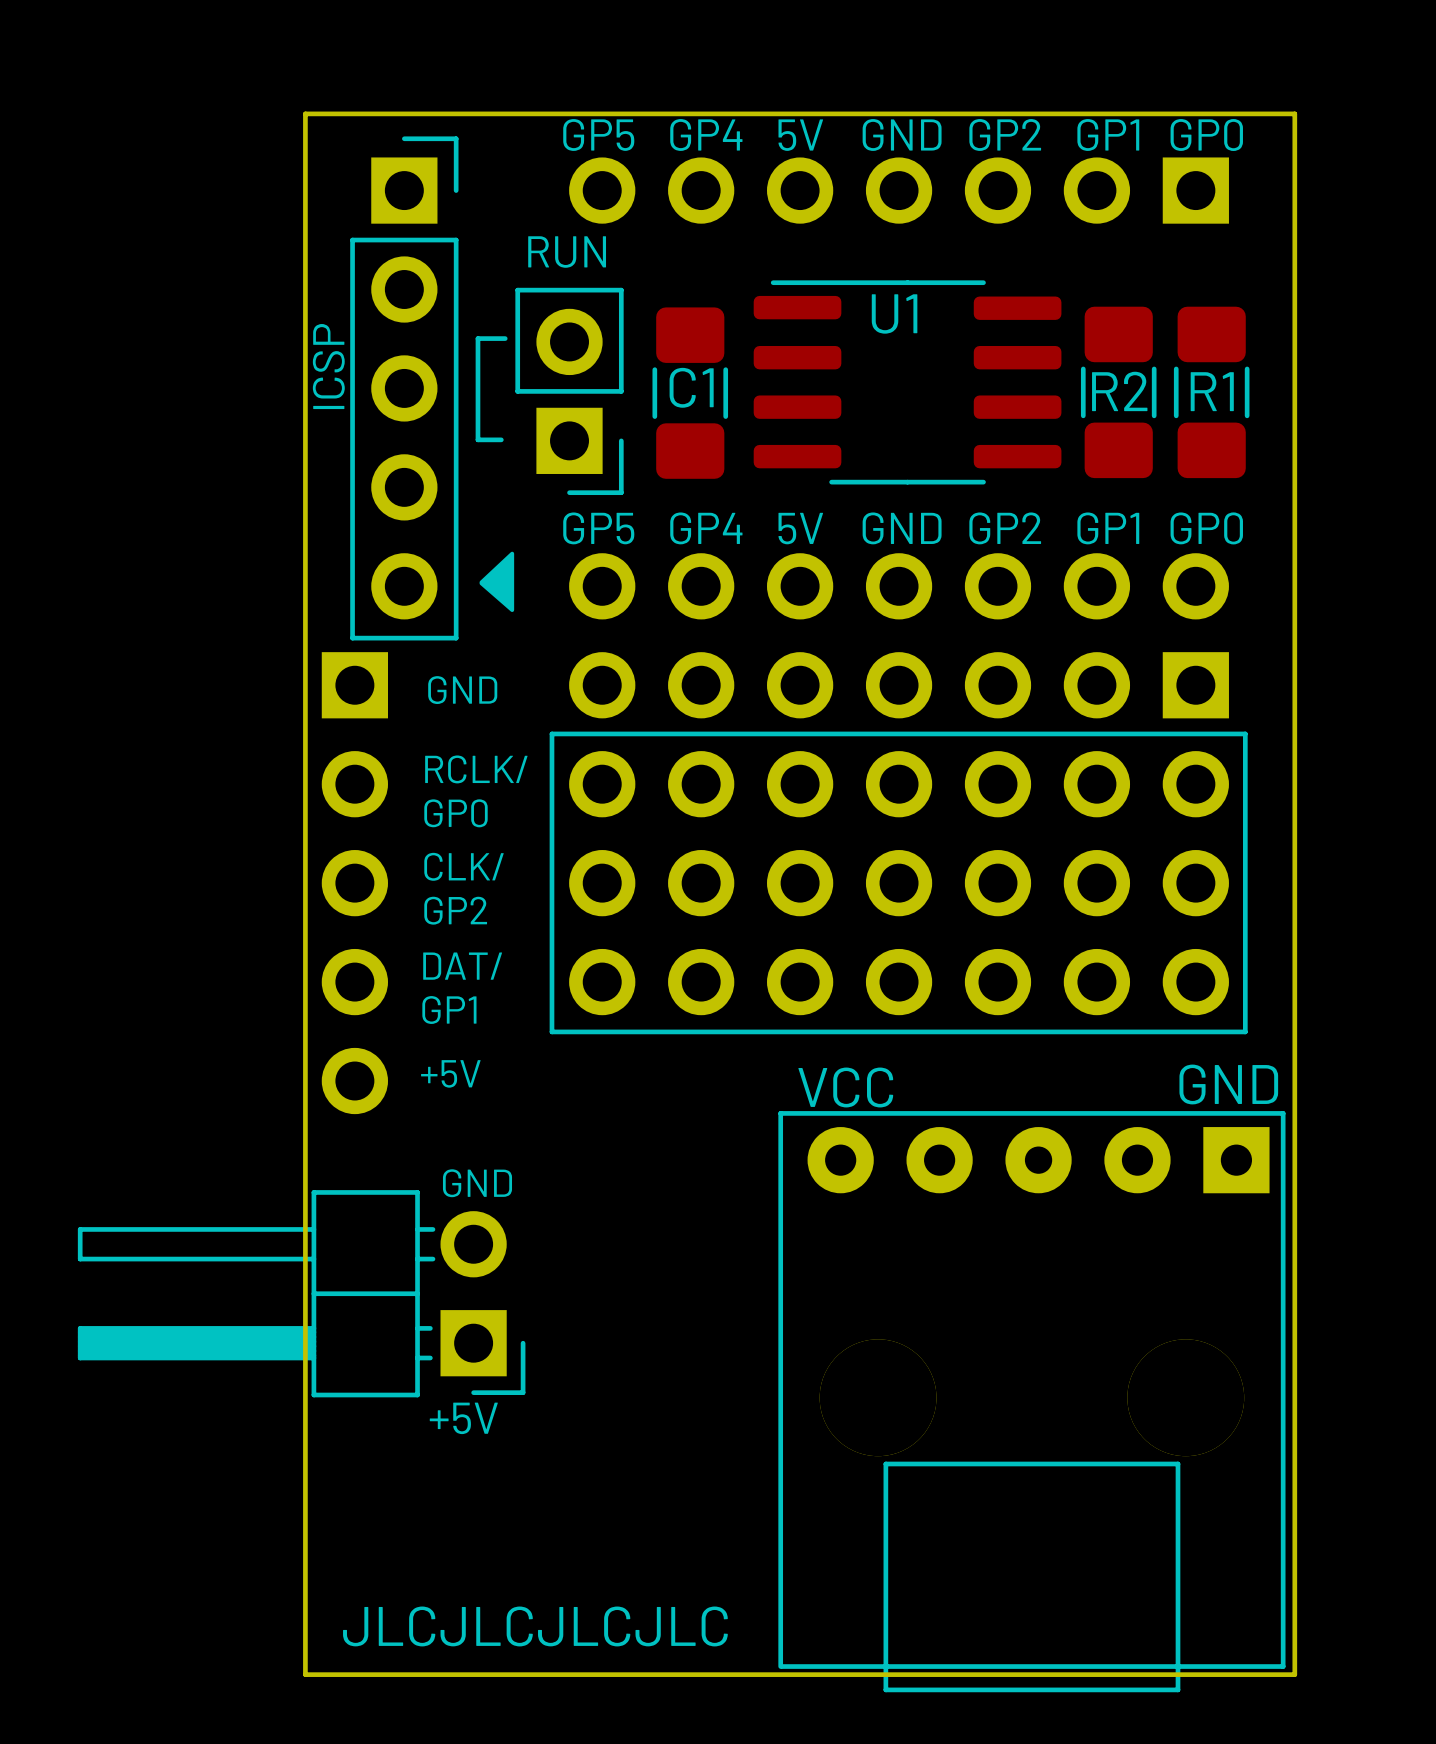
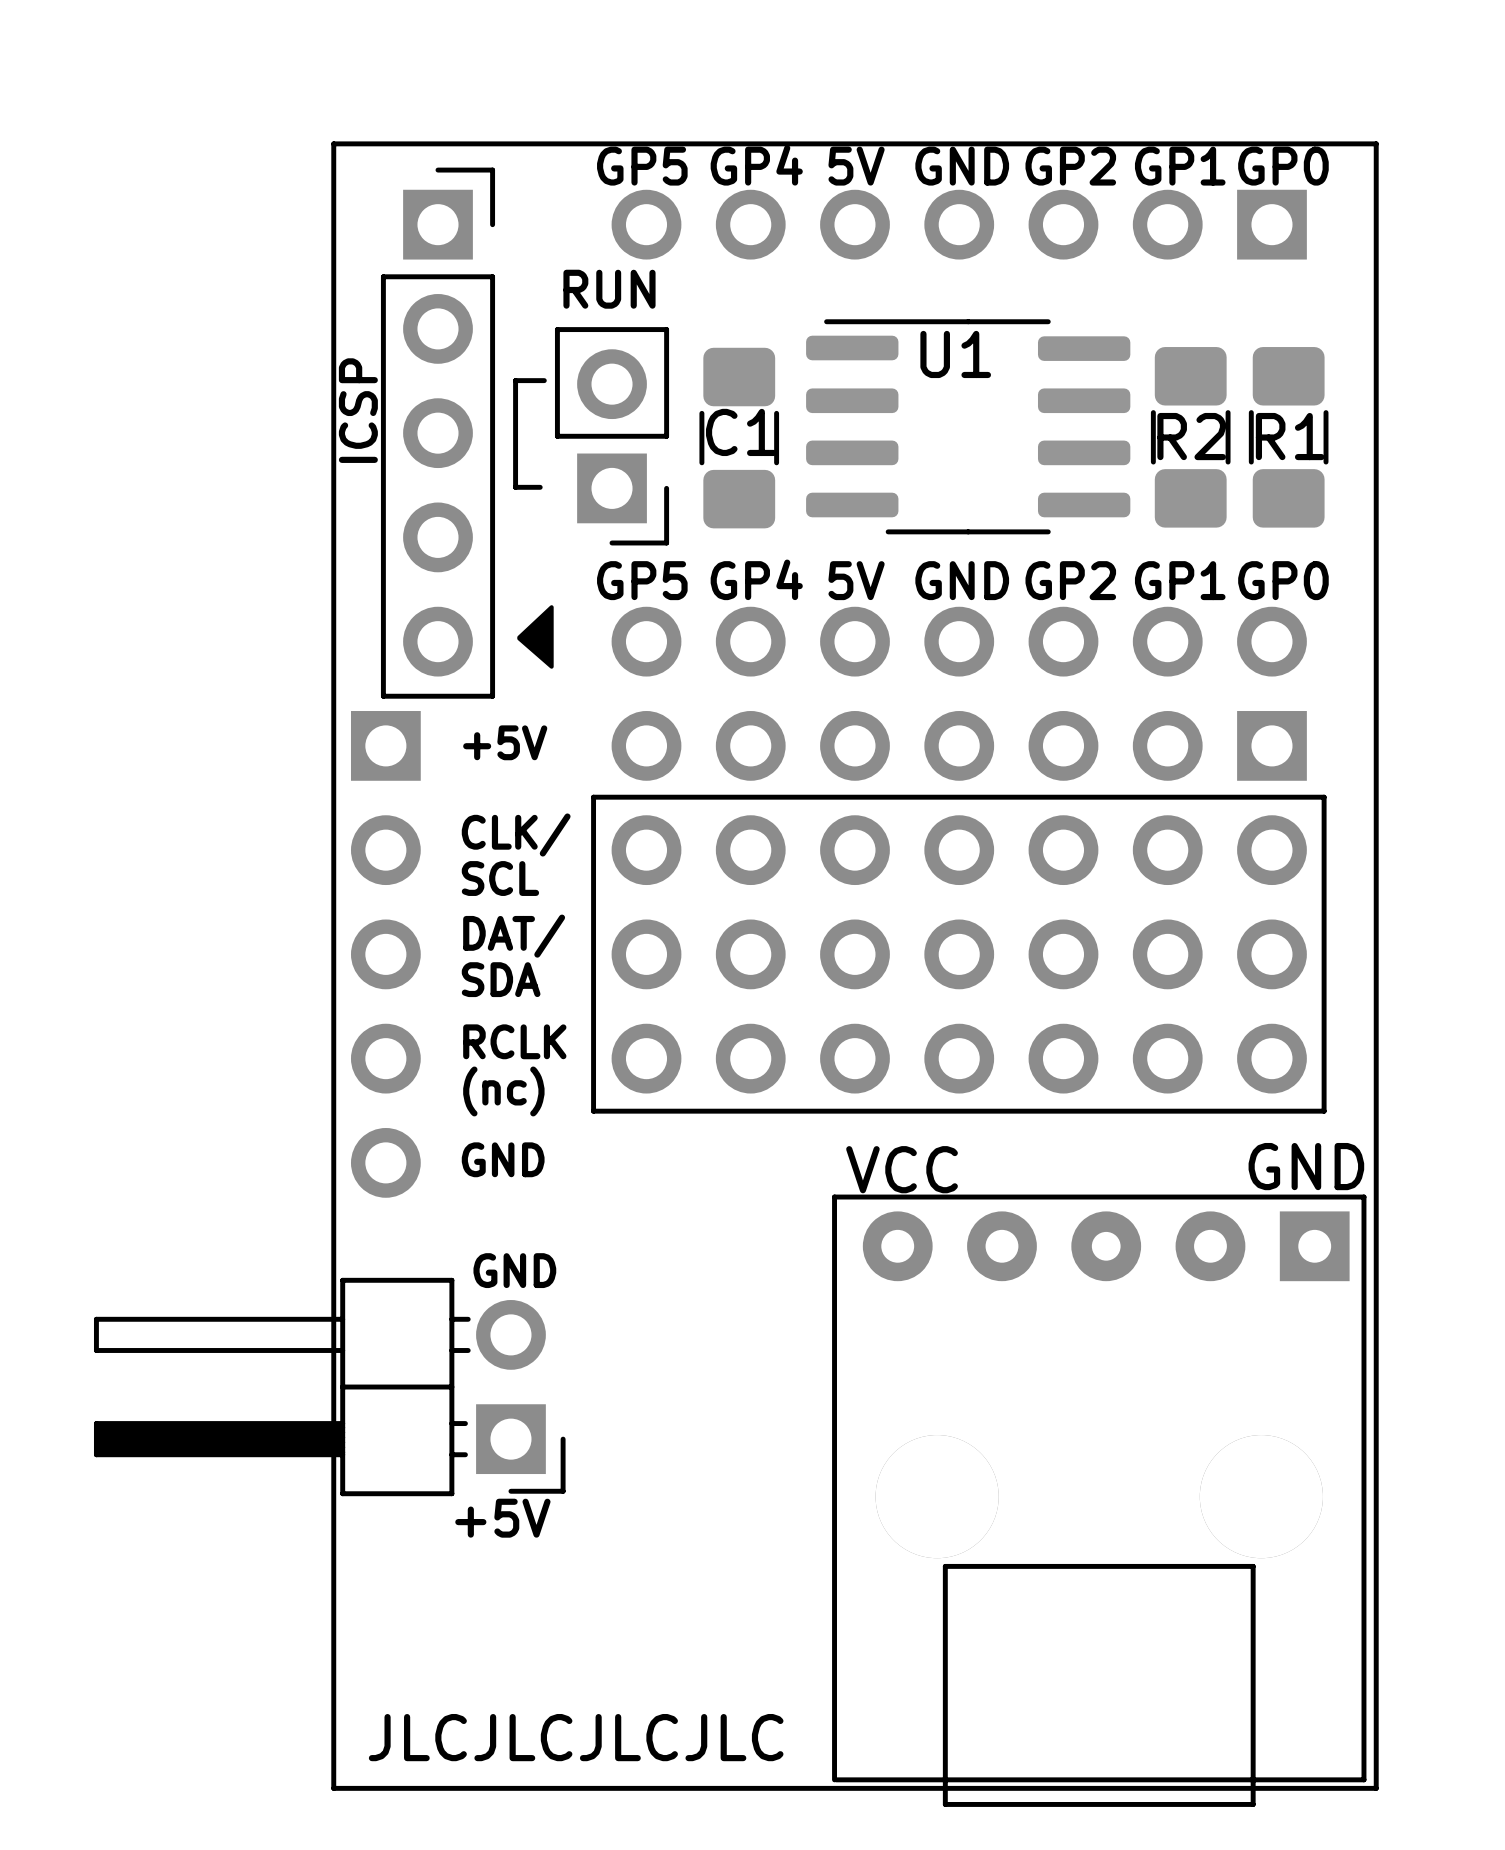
text: GND (462, 690) -> +5V (505, 742)
text: RCLK/ (476, 769) -> CLK/ (516, 835)
text: GP0 (455, 813) -> SCL (500, 878)
text: CLK/ (464, 866) -> DAT/ (514, 936)
text: GP2 (455, 910) -> SDA (501, 979)
text: DAT/ (462, 966) -> RCLK (514, 1041)
text: GP1 (449, 1010) -> (nc) (503, 1091)
text: +5V (450, 1073) -> GND (503, 1159)

